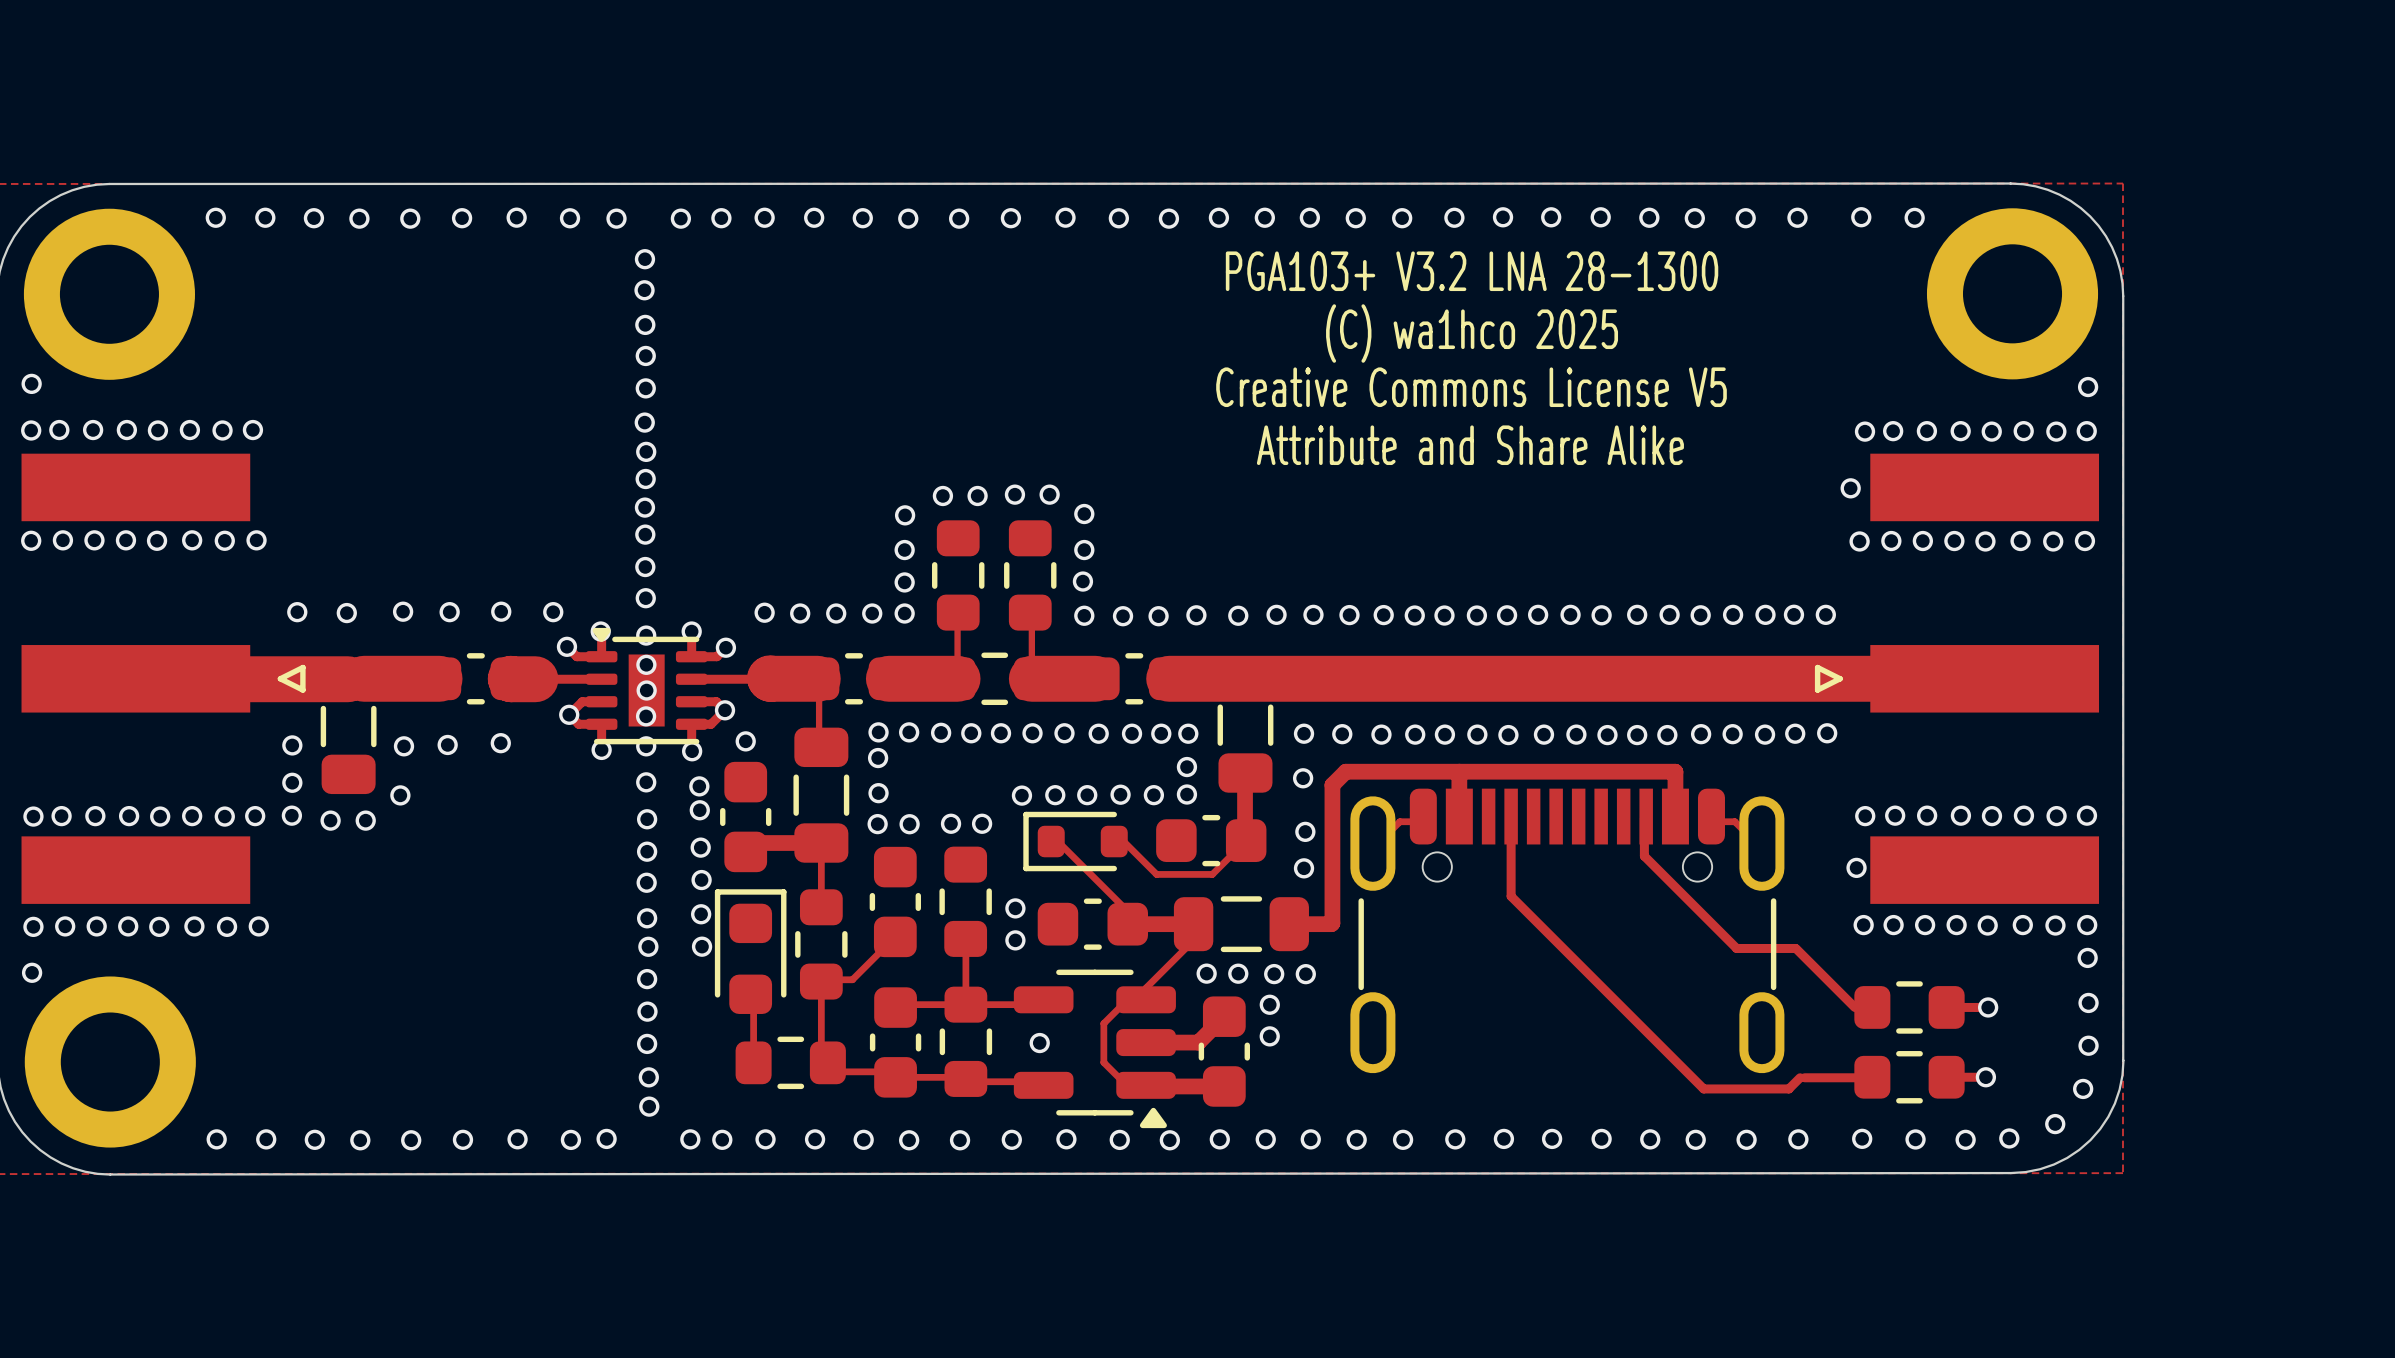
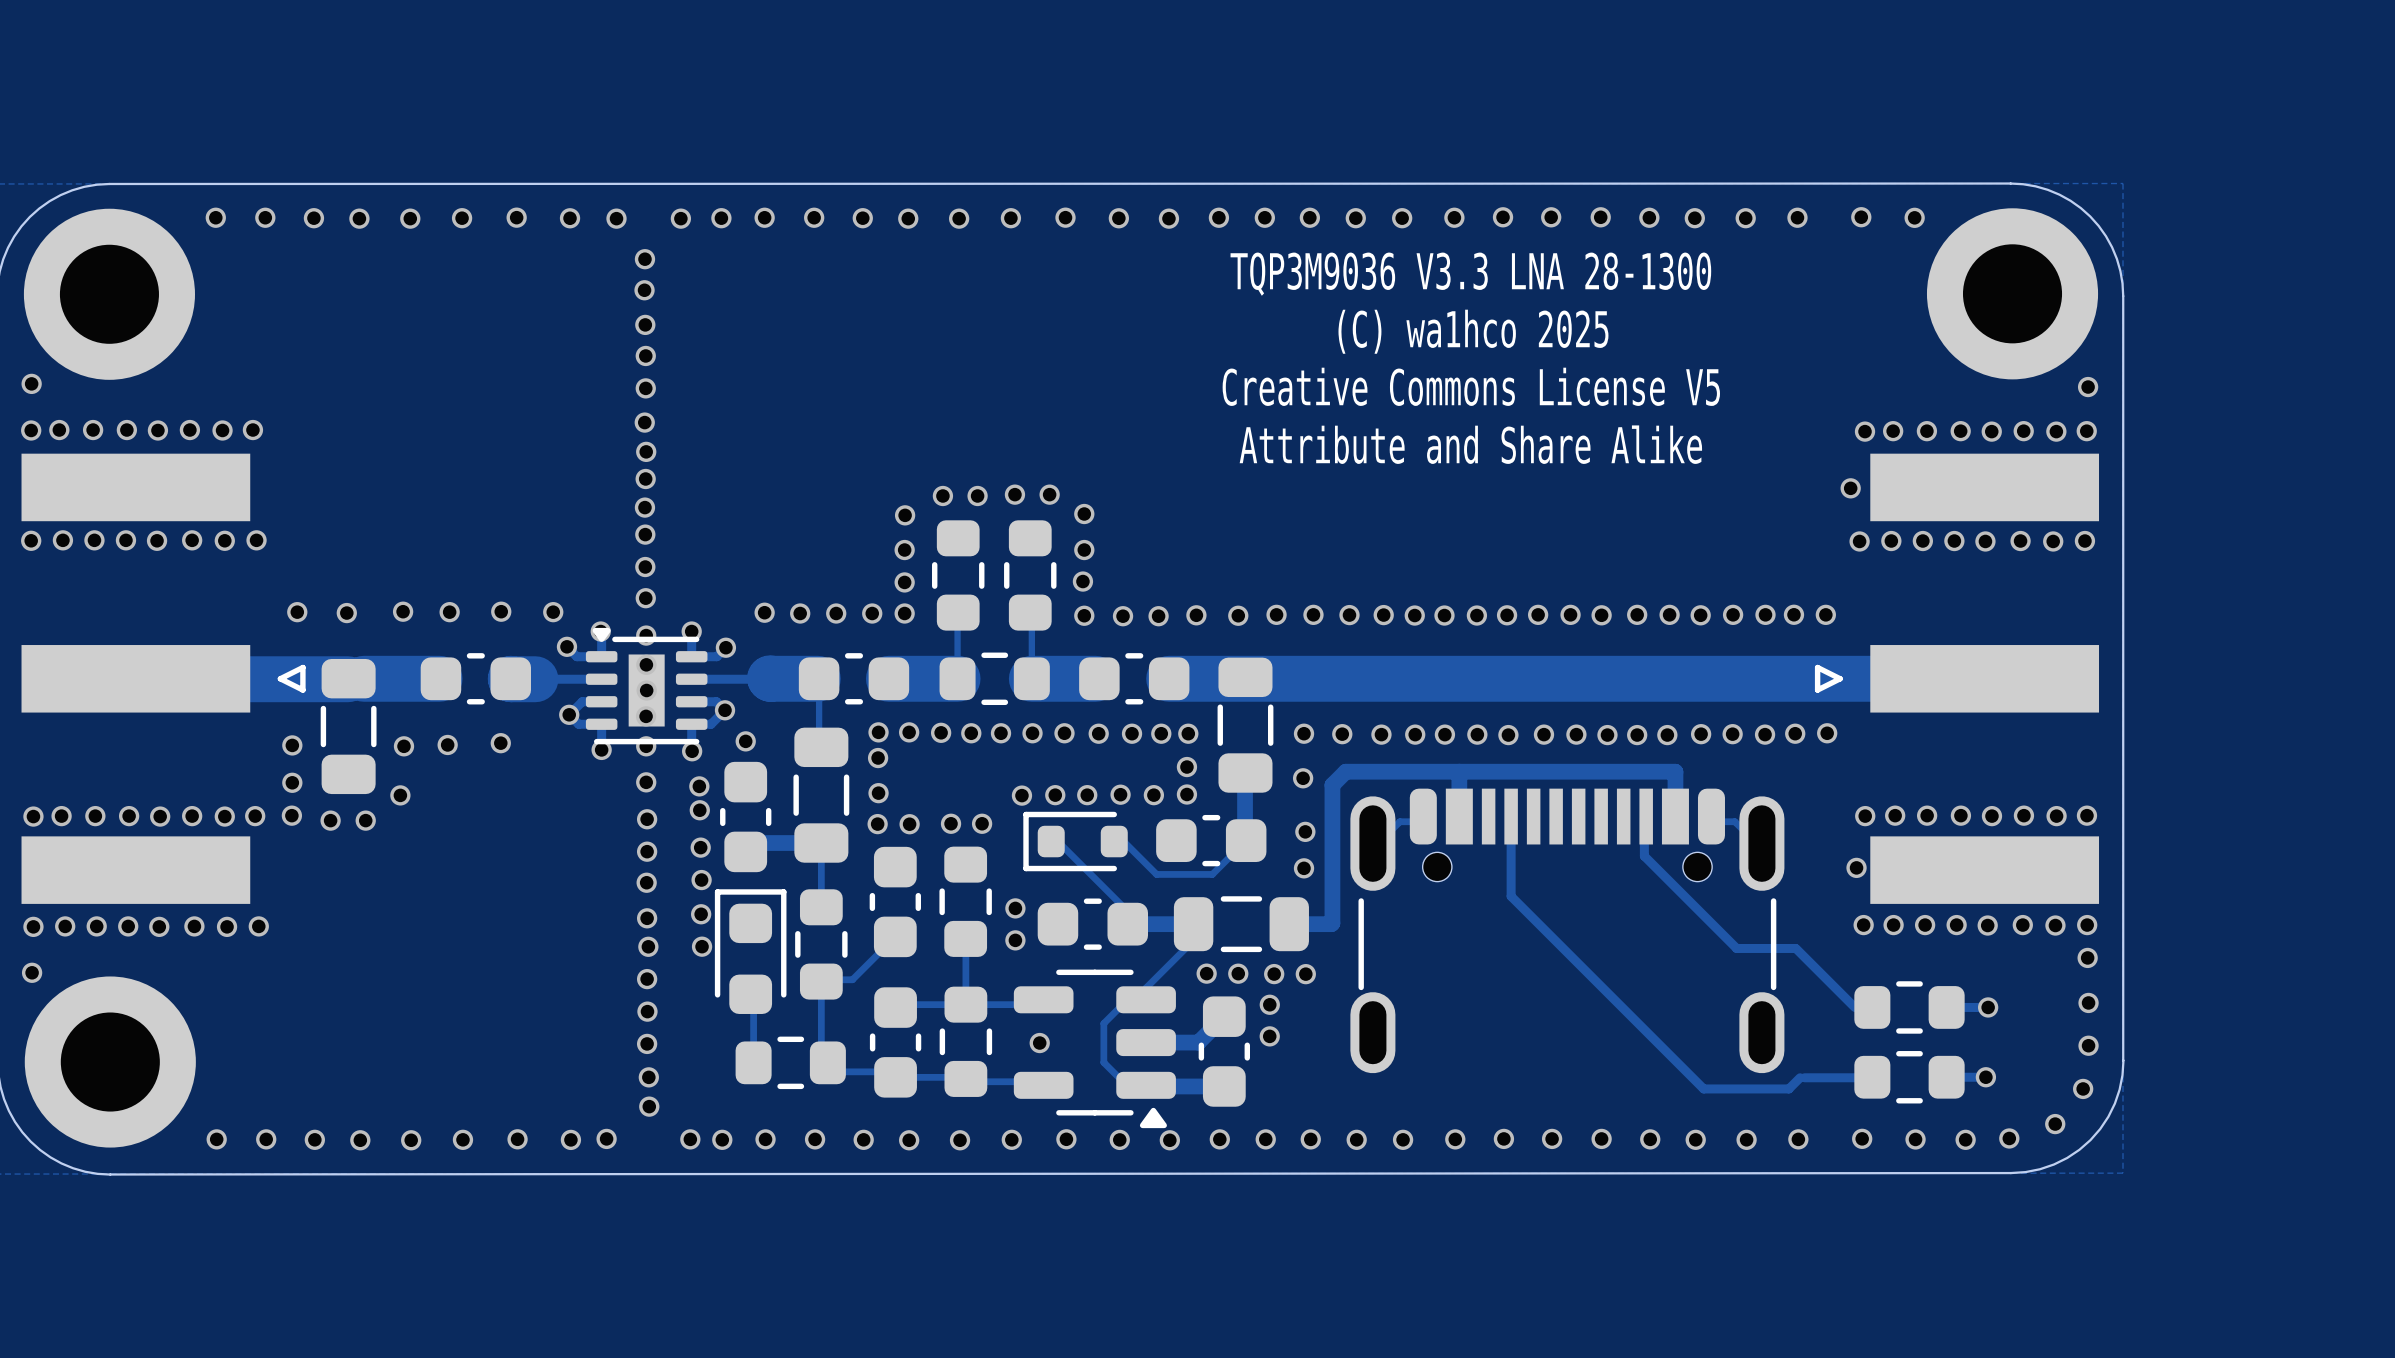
text: PGA103+ V3.2 LNA 28-1300 (1472, 271) -> TQP3M9036 V3.3 LNA 28-1300 (1470, 274)

